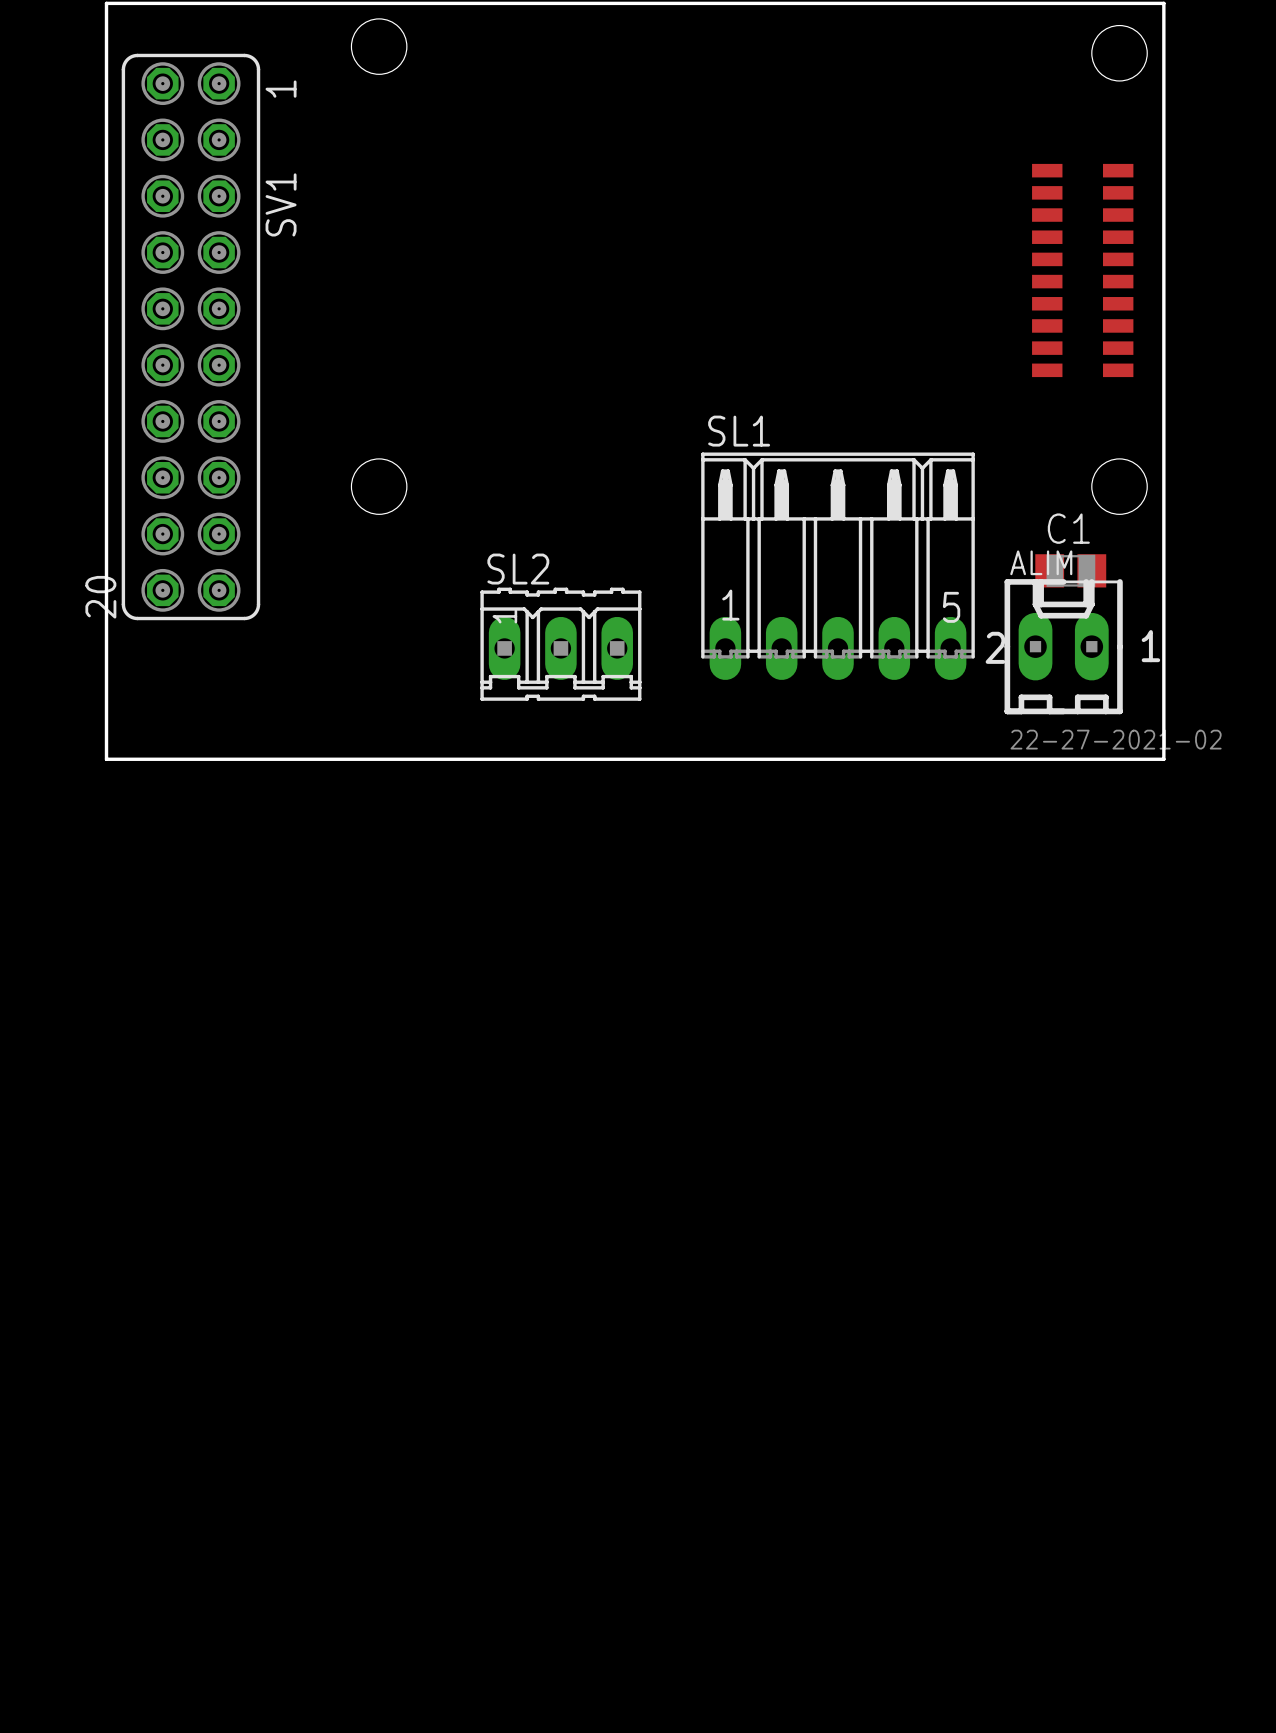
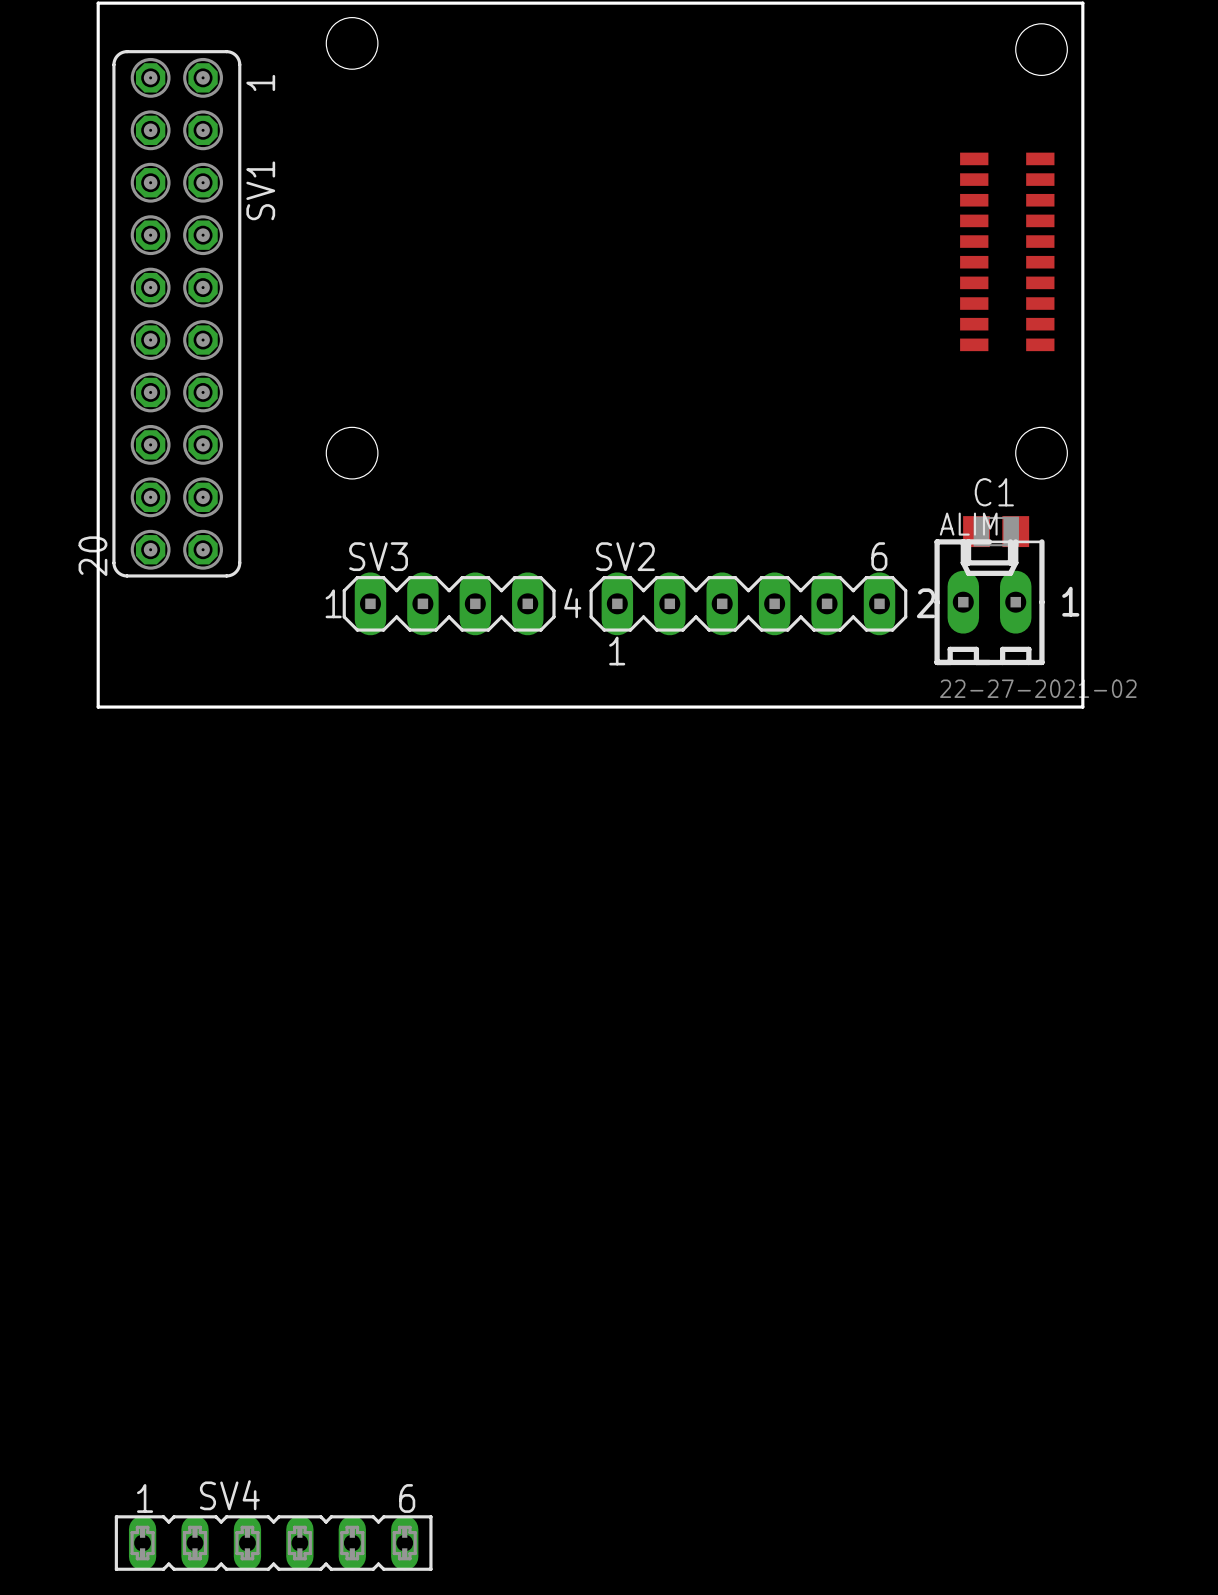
SL1: (838, 566) -> none
SL2: (560, 644) -> none
SV3: none -> (449, 603)
SV2: none -> (748, 603)
SV4: none -> (273, 1543)

